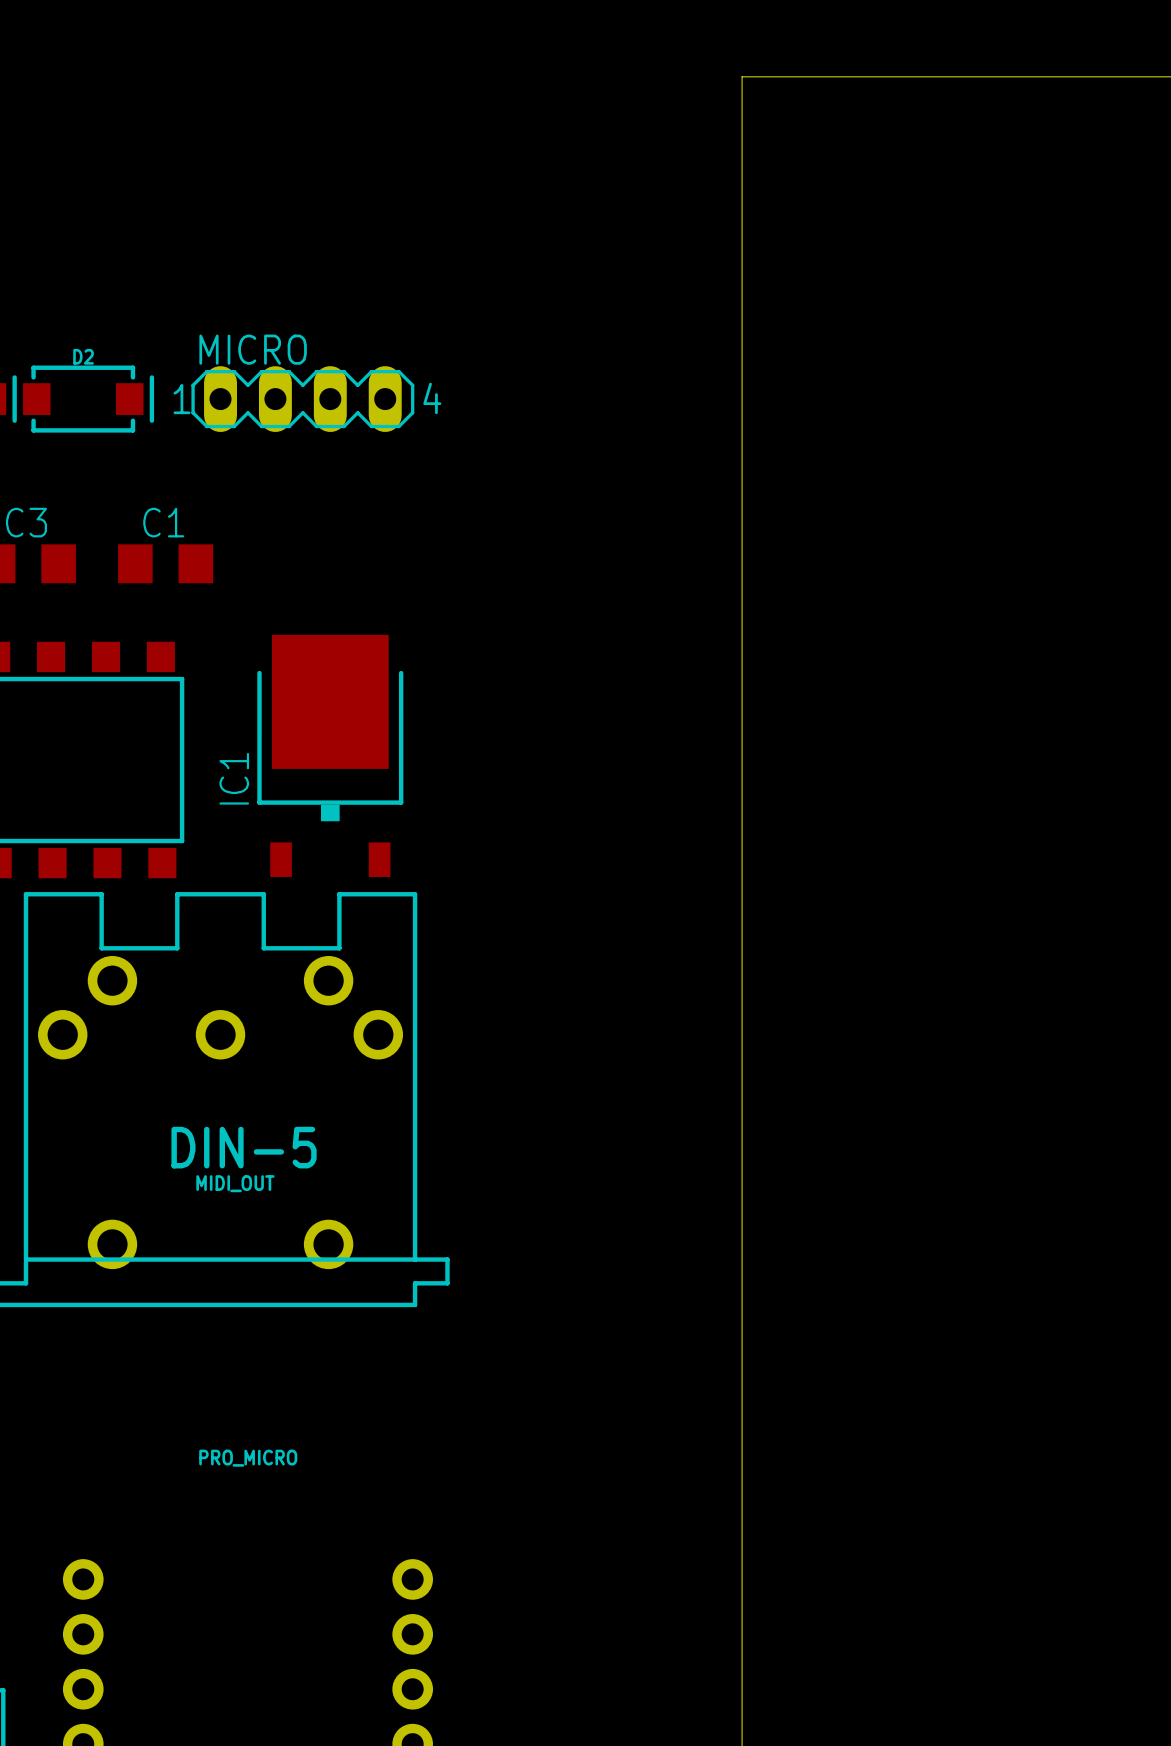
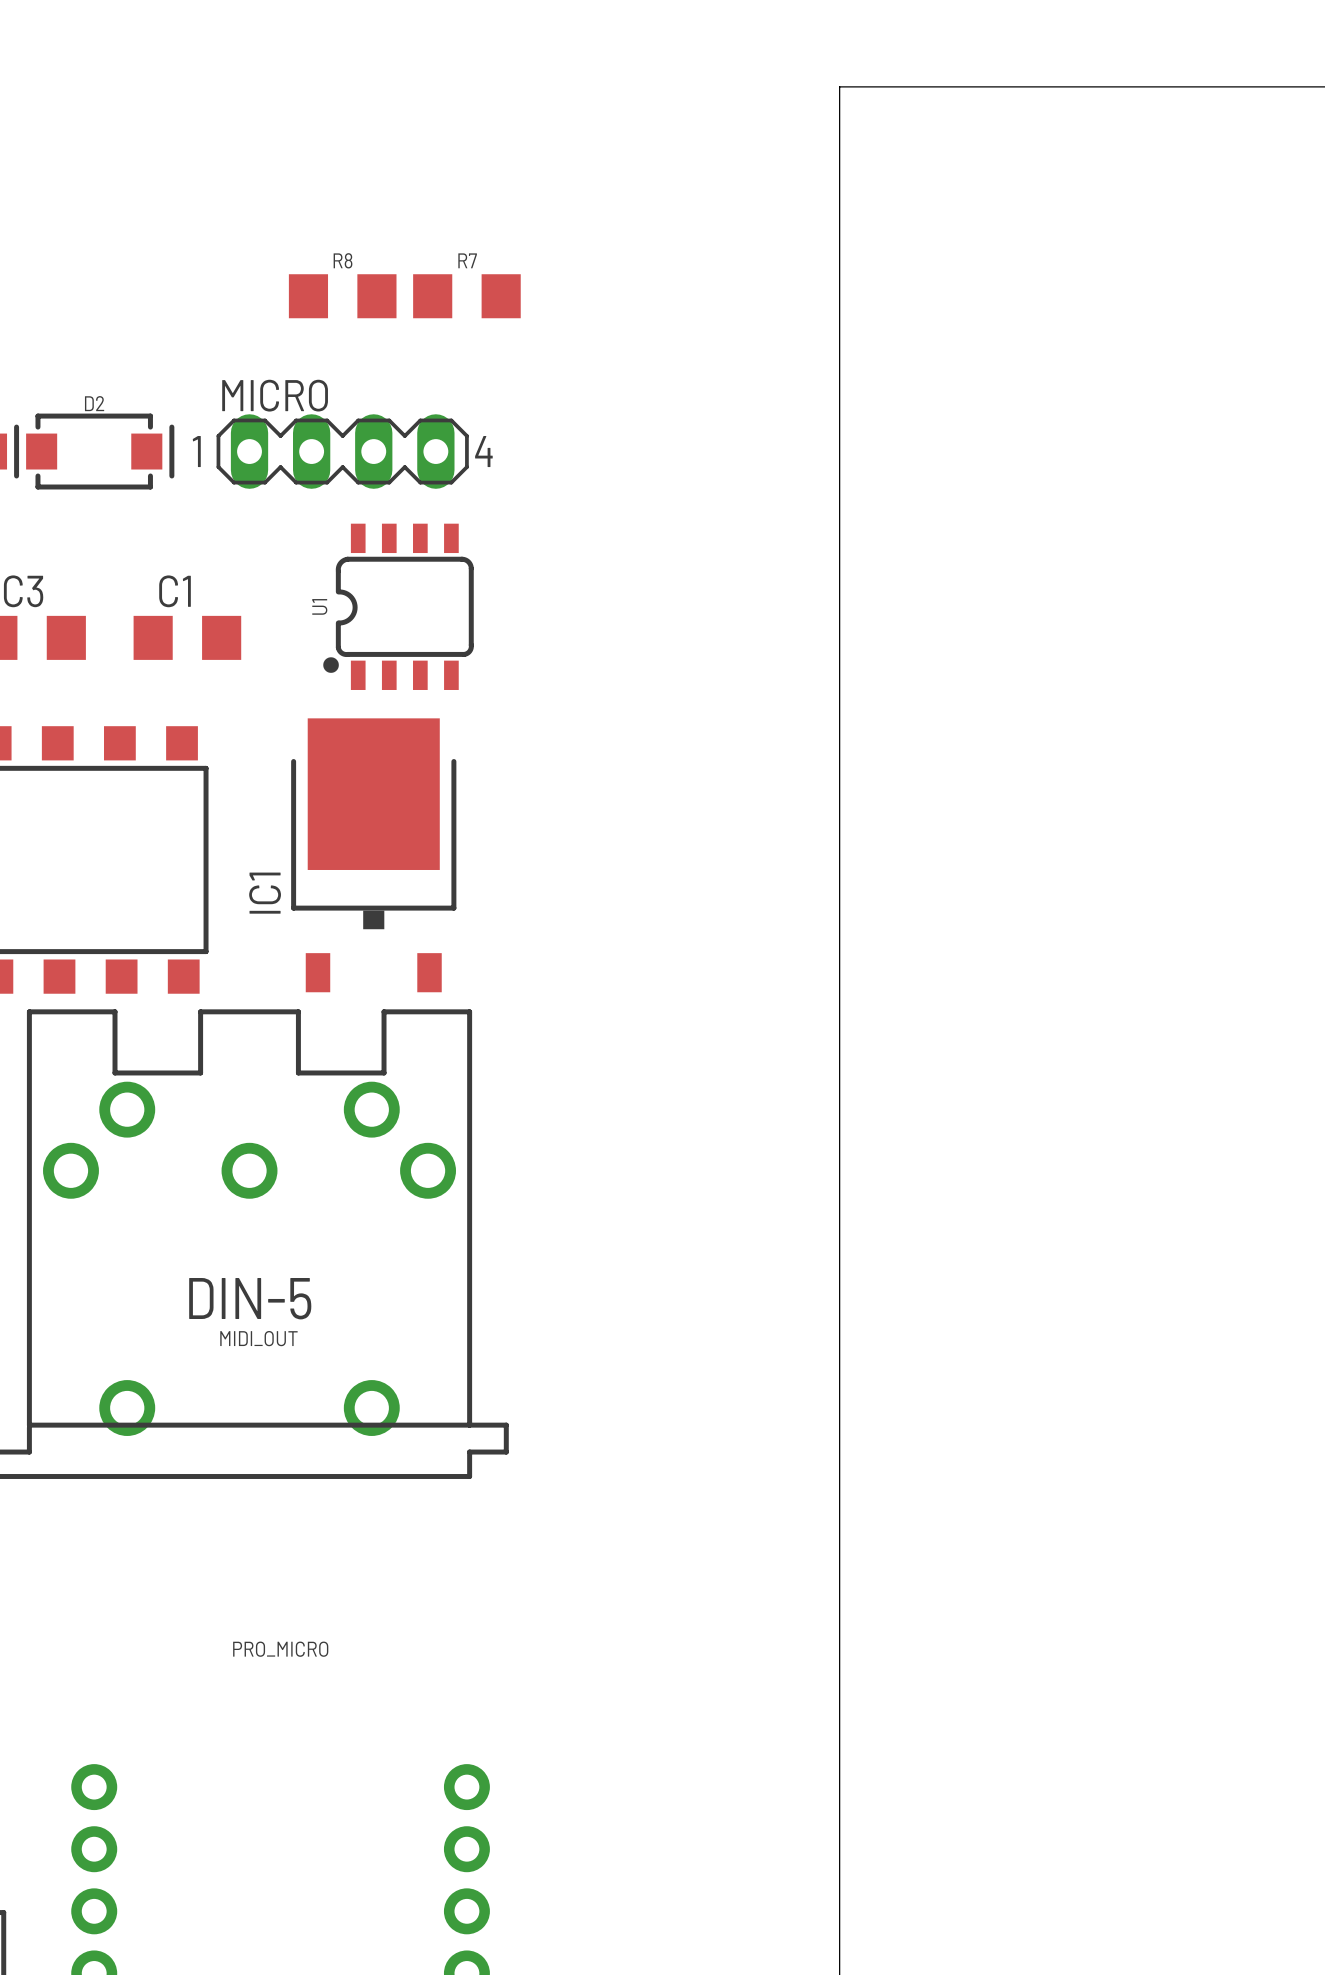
R8: none -> (342, 296)
R7: none -> (466, 296)
U1: none -> (398, 606)

